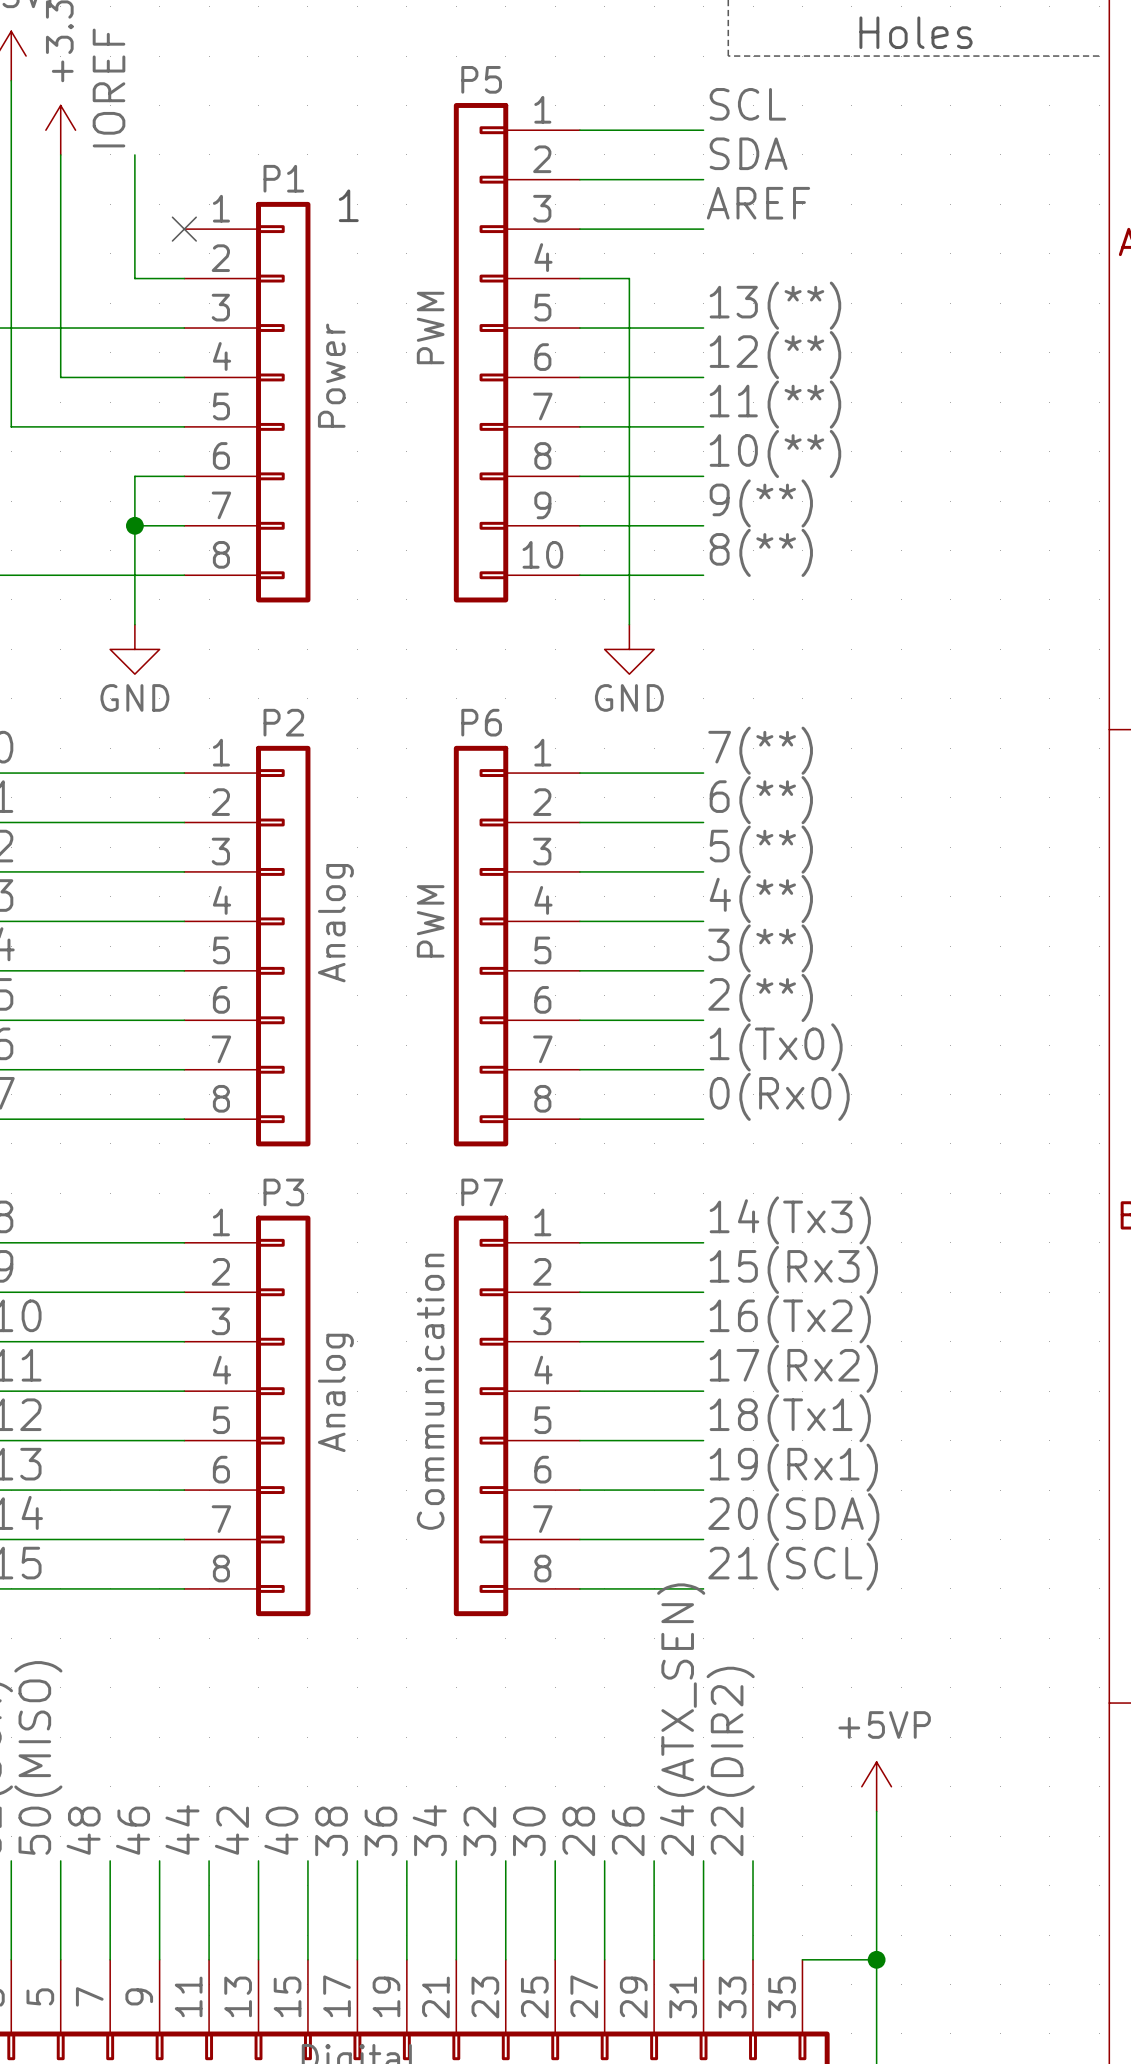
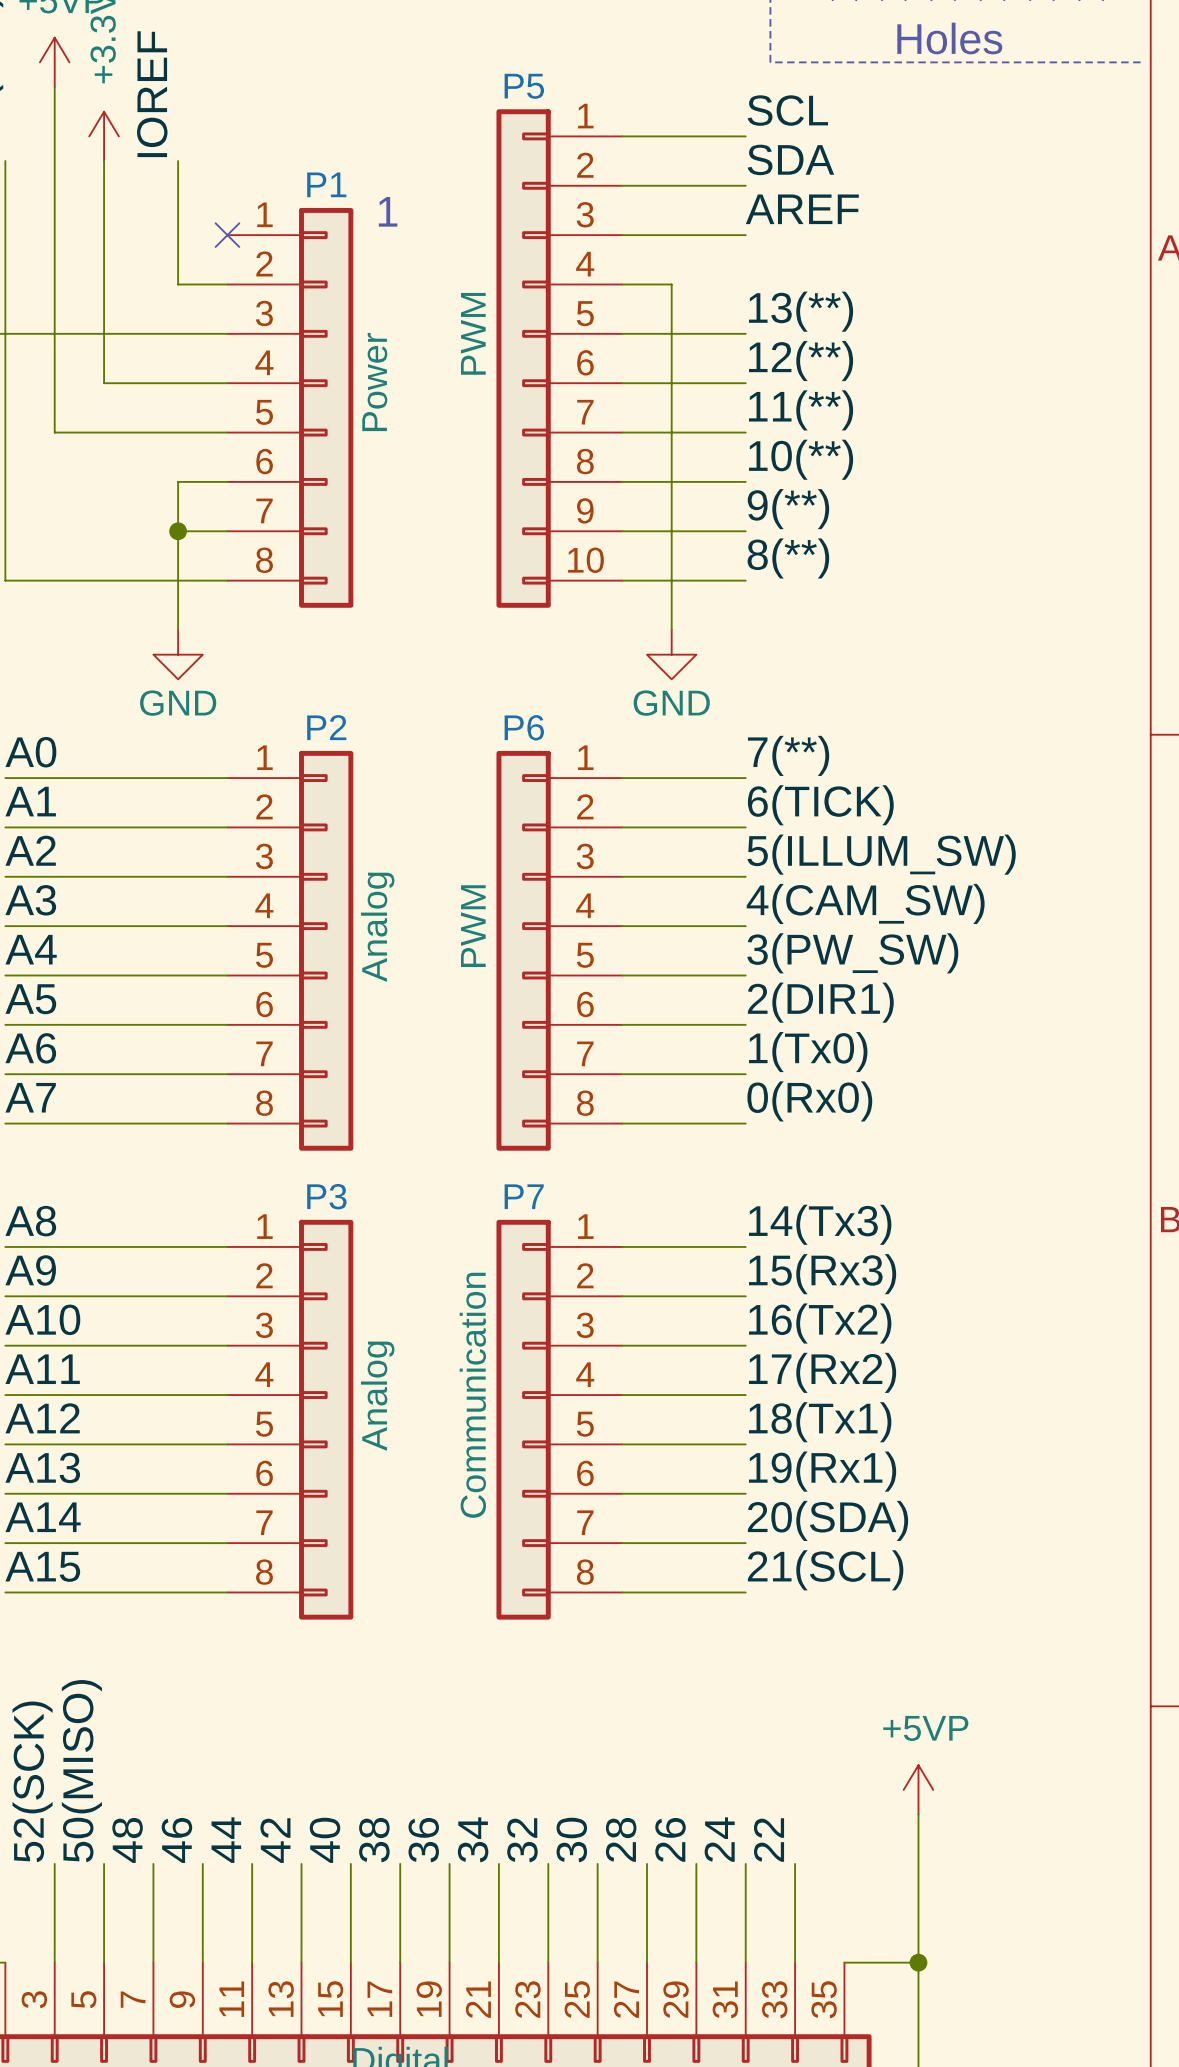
label: 6(**) (761, 800) -> 6(TICK) (820, 805)
label: 5(**) (761, 849) -> 5(ILLUM_SW) (881, 854)
label: 4(**) (761, 899) -> 4(CAM_SW) (865, 903)
label: 3(**) (760, 948) -> 3(PW_SW) (852, 953)
label: 2(**) (760, 997) -> 2(DIR1) (820, 1002)
label: 24(ATX_SEN) (681, 1719) -> 24 (719, 1839)
label: 22(DIR2) (730, 1761) -> 22 (769, 1840)

